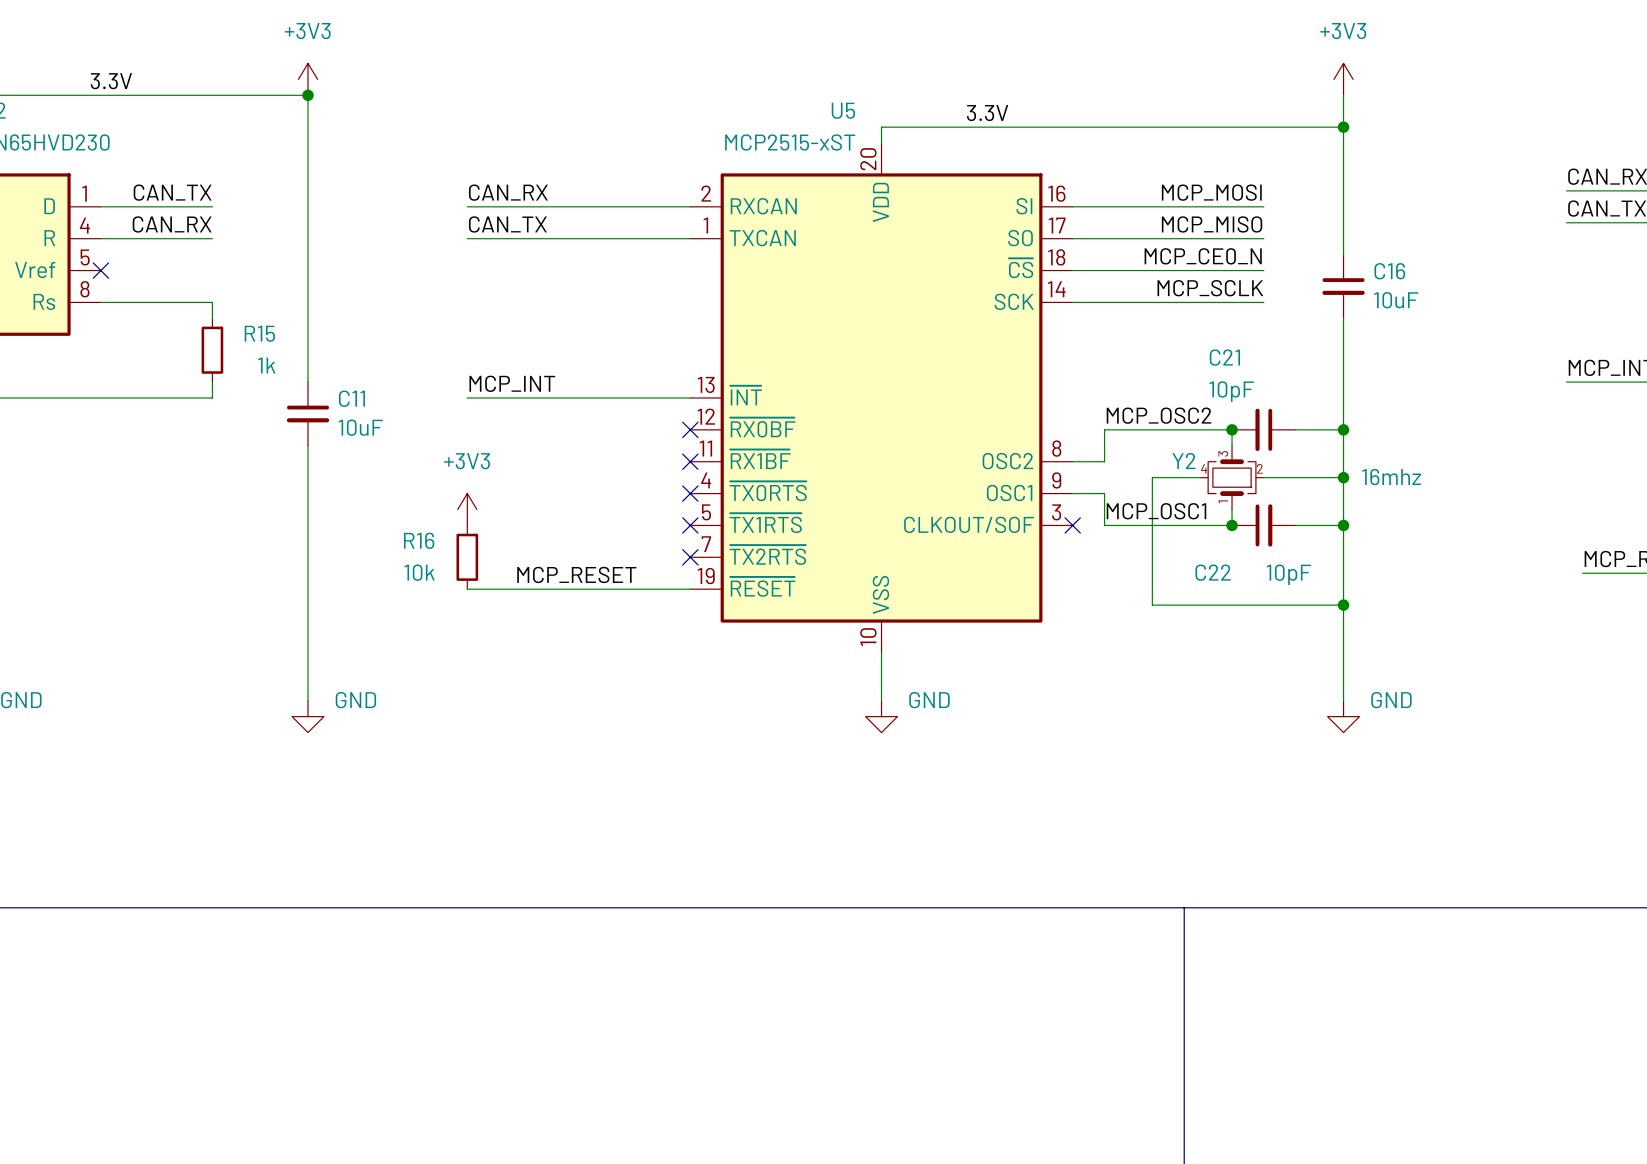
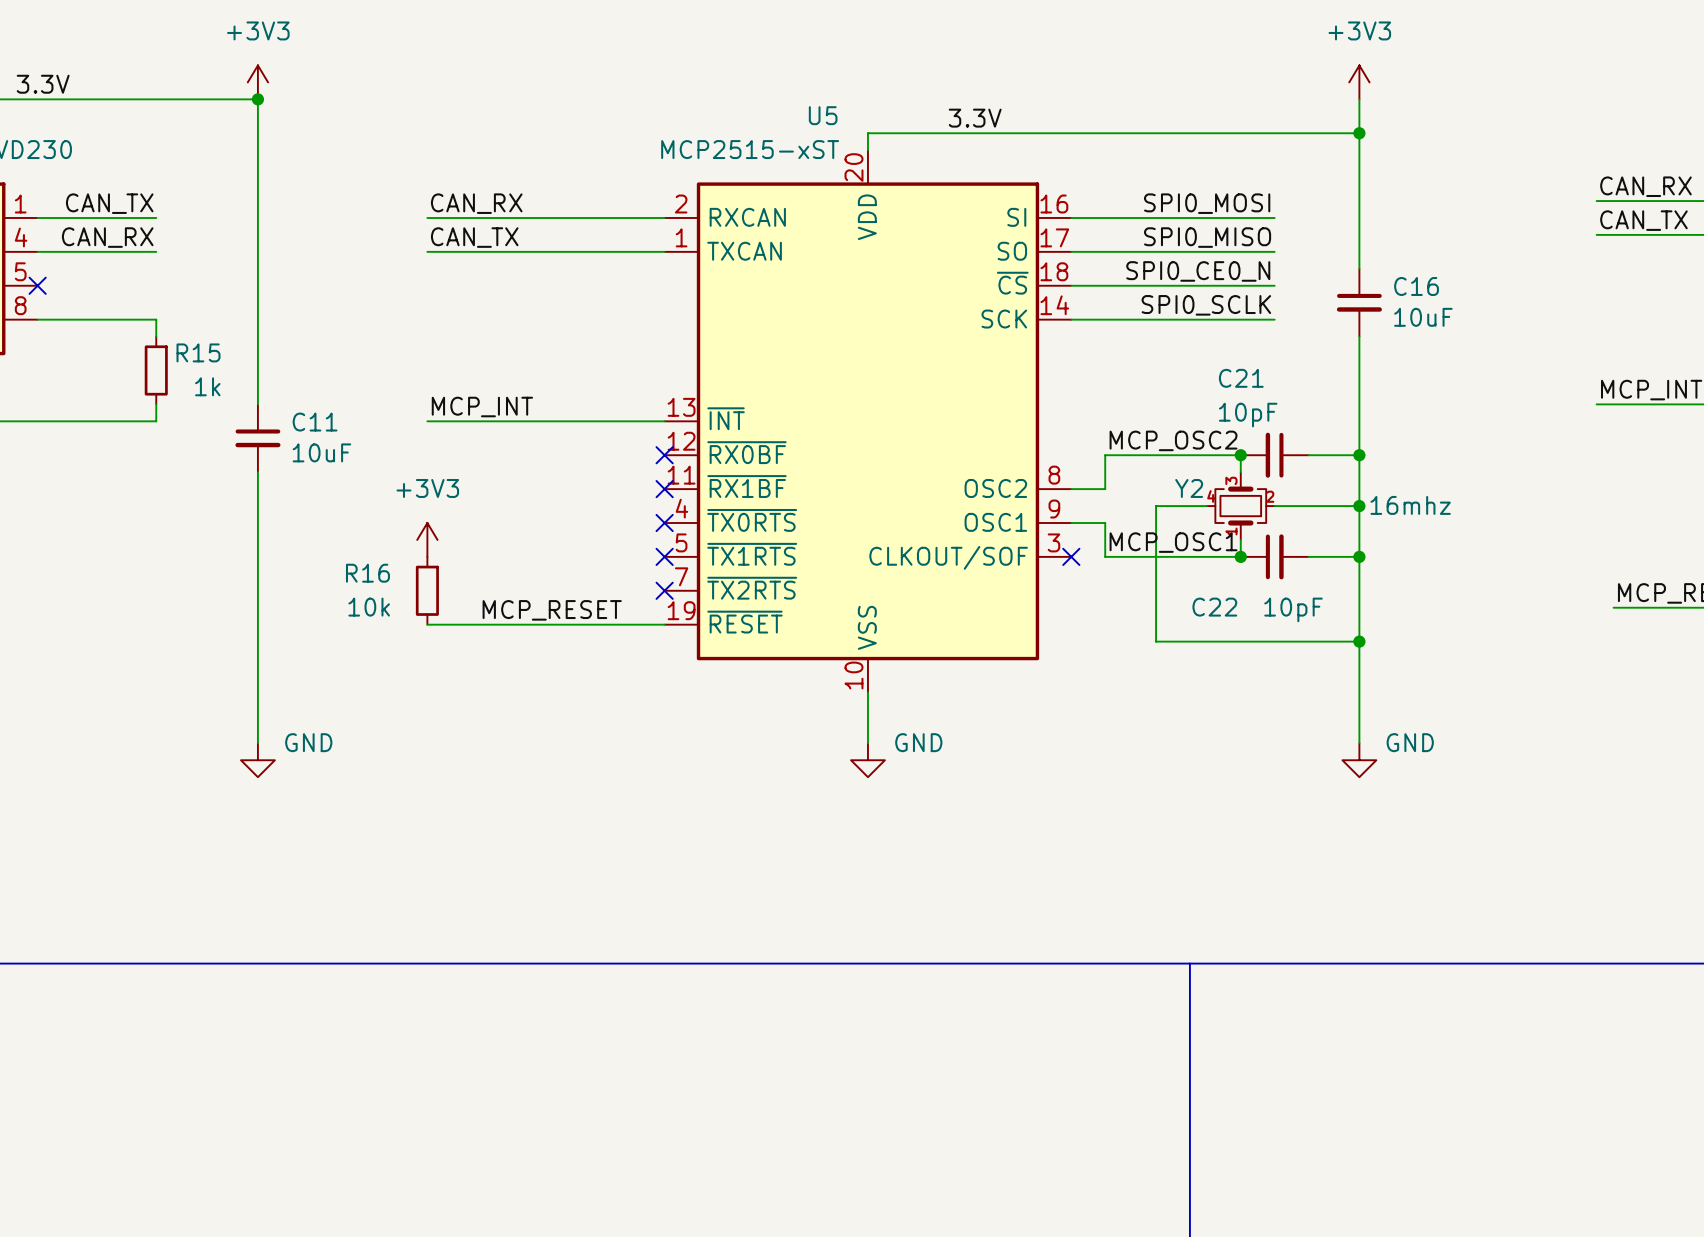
label: MCP_MOSI (1211, 192) -> SPI0_MOSI (1207, 203)
label: MCP_MISO (1212, 224) -> SPI0_MISO (1207, 237)
label: MCP_CE0_N (1203, 256) -> SPI0_CE0_N (1198, 271)
label: MCP_SCLK (1210, 288) -> SPI0_SCLK (1206, 305)

